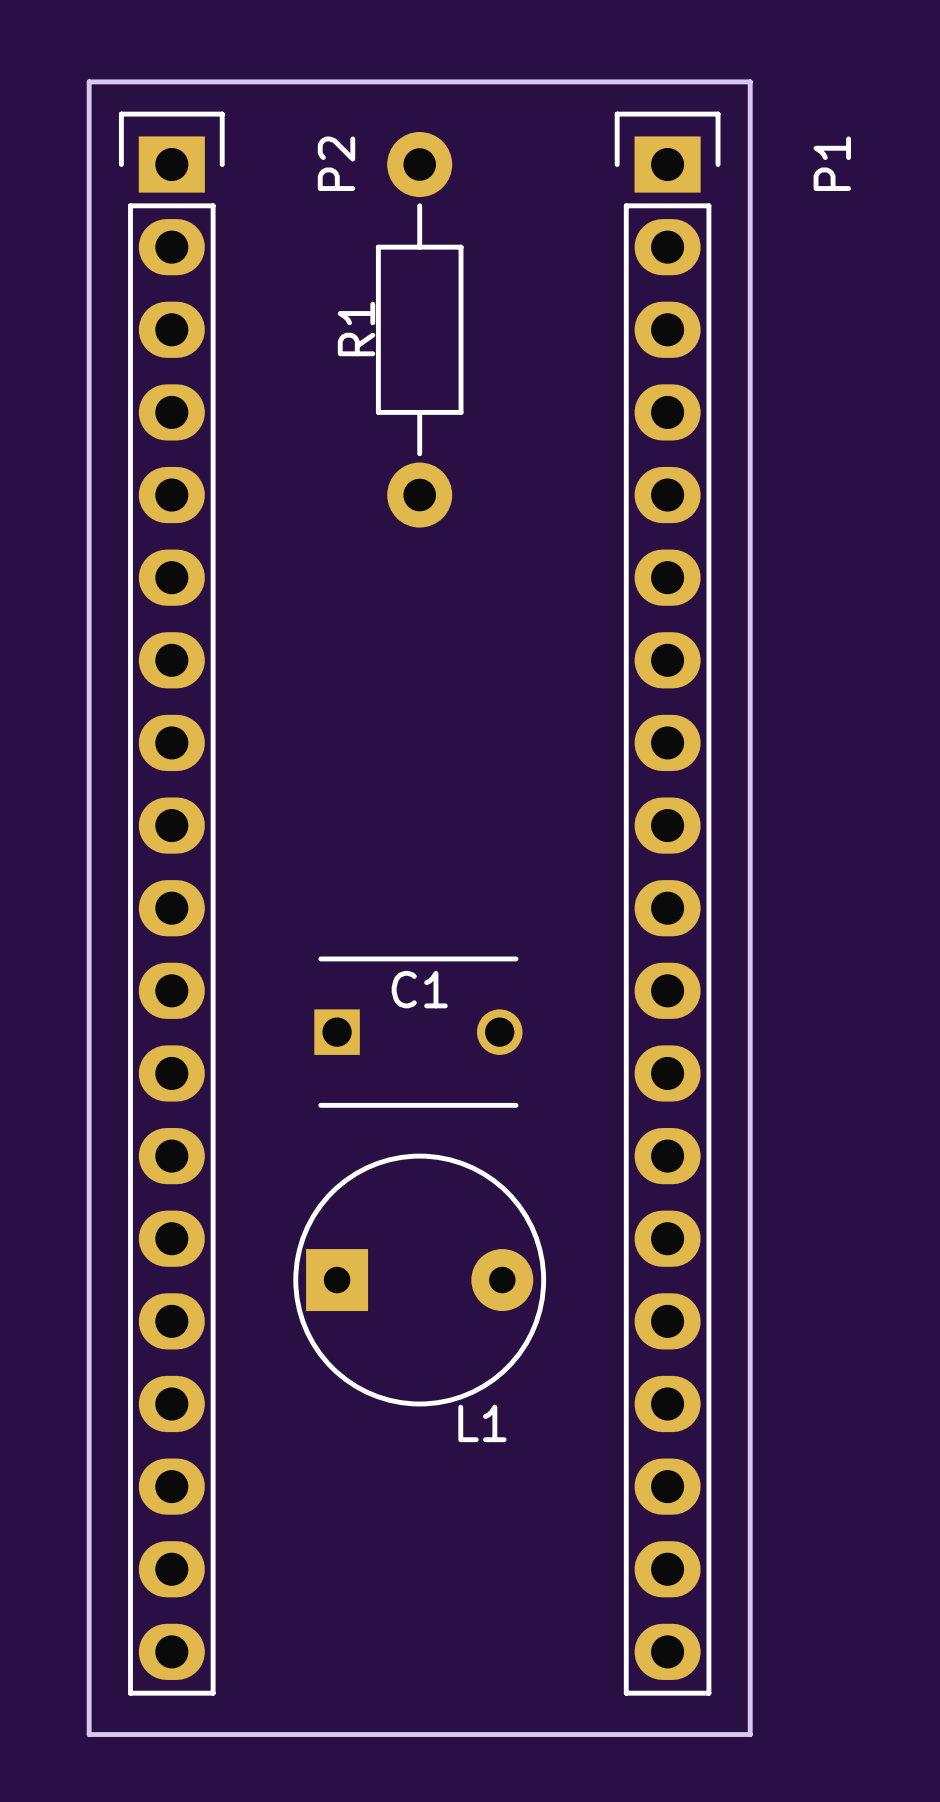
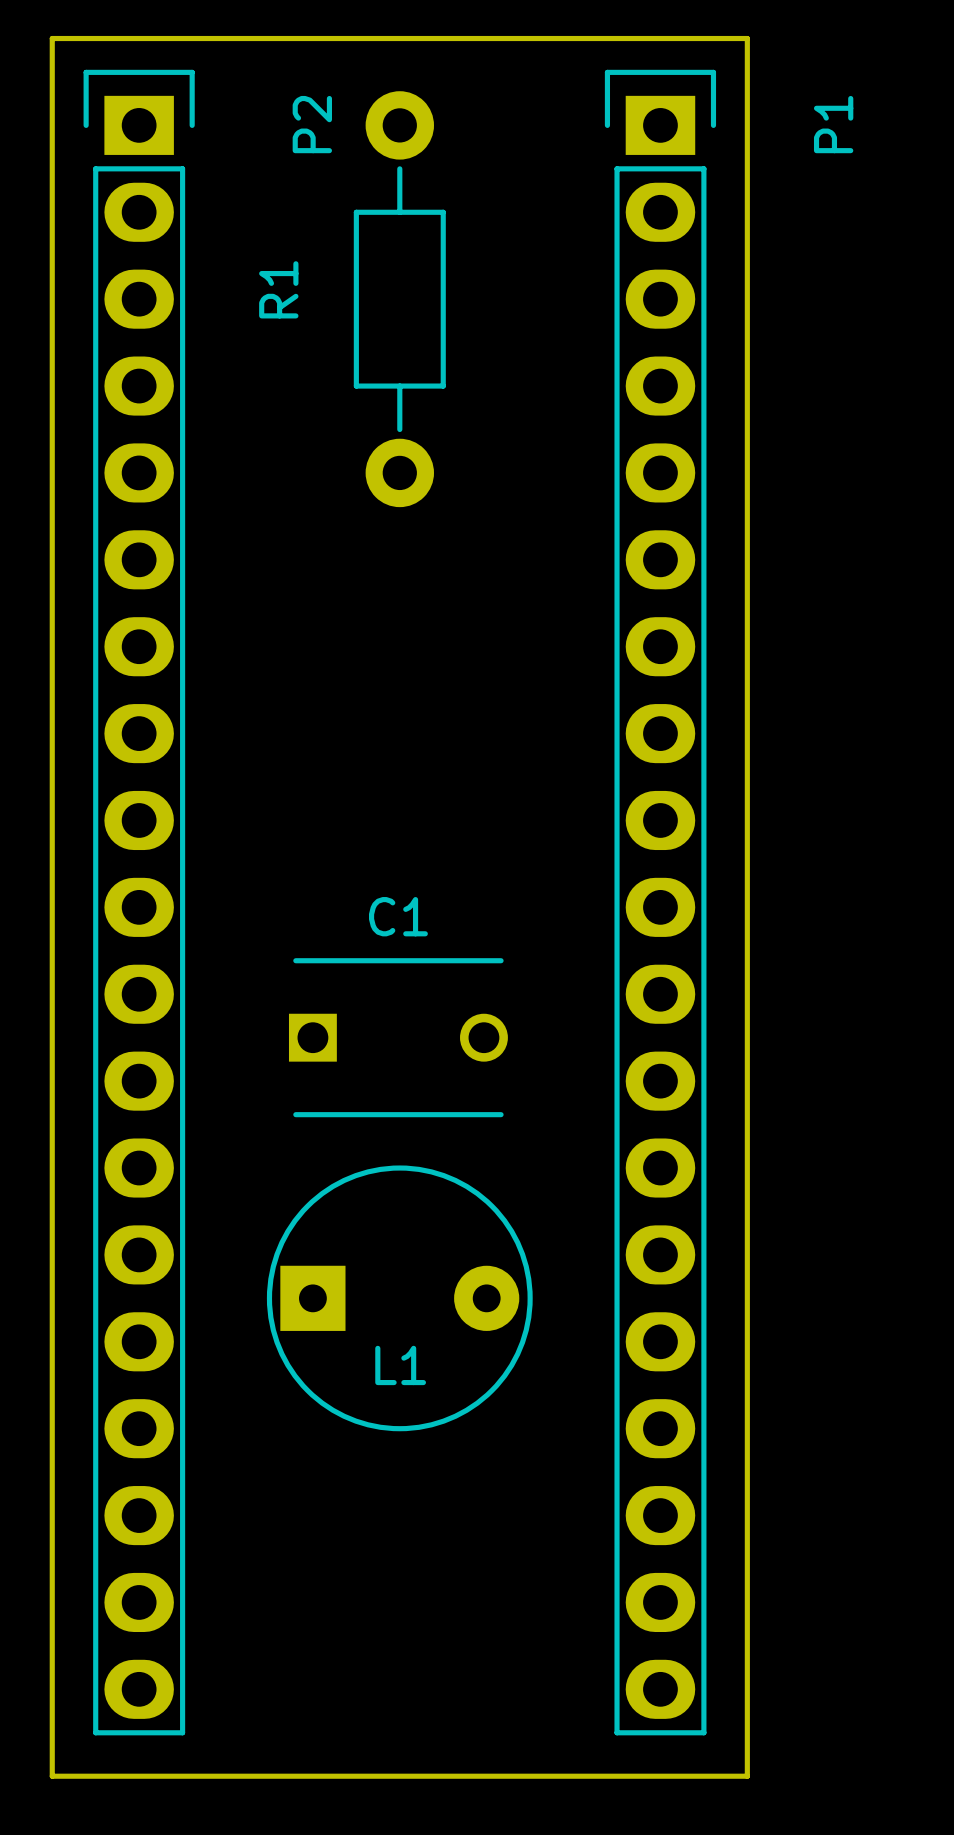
R1 name position: R1 (356, 329) -> R1 (278, 289)
C1 name position: C1 (419, 989) -> C1 (398, 916)
L1 name position: L1 (482, 1423) -> L1 (400, 1365)

